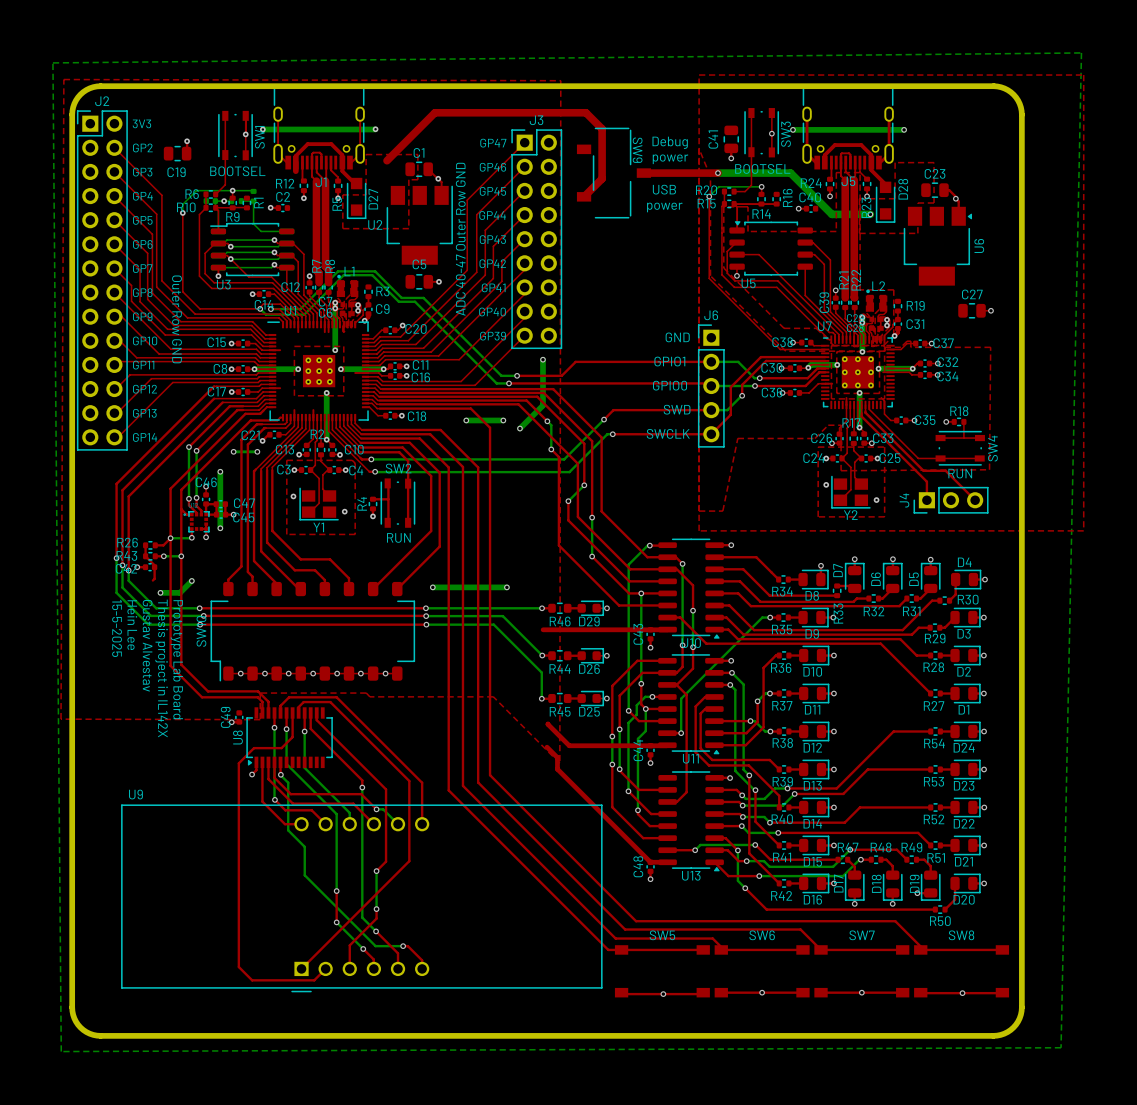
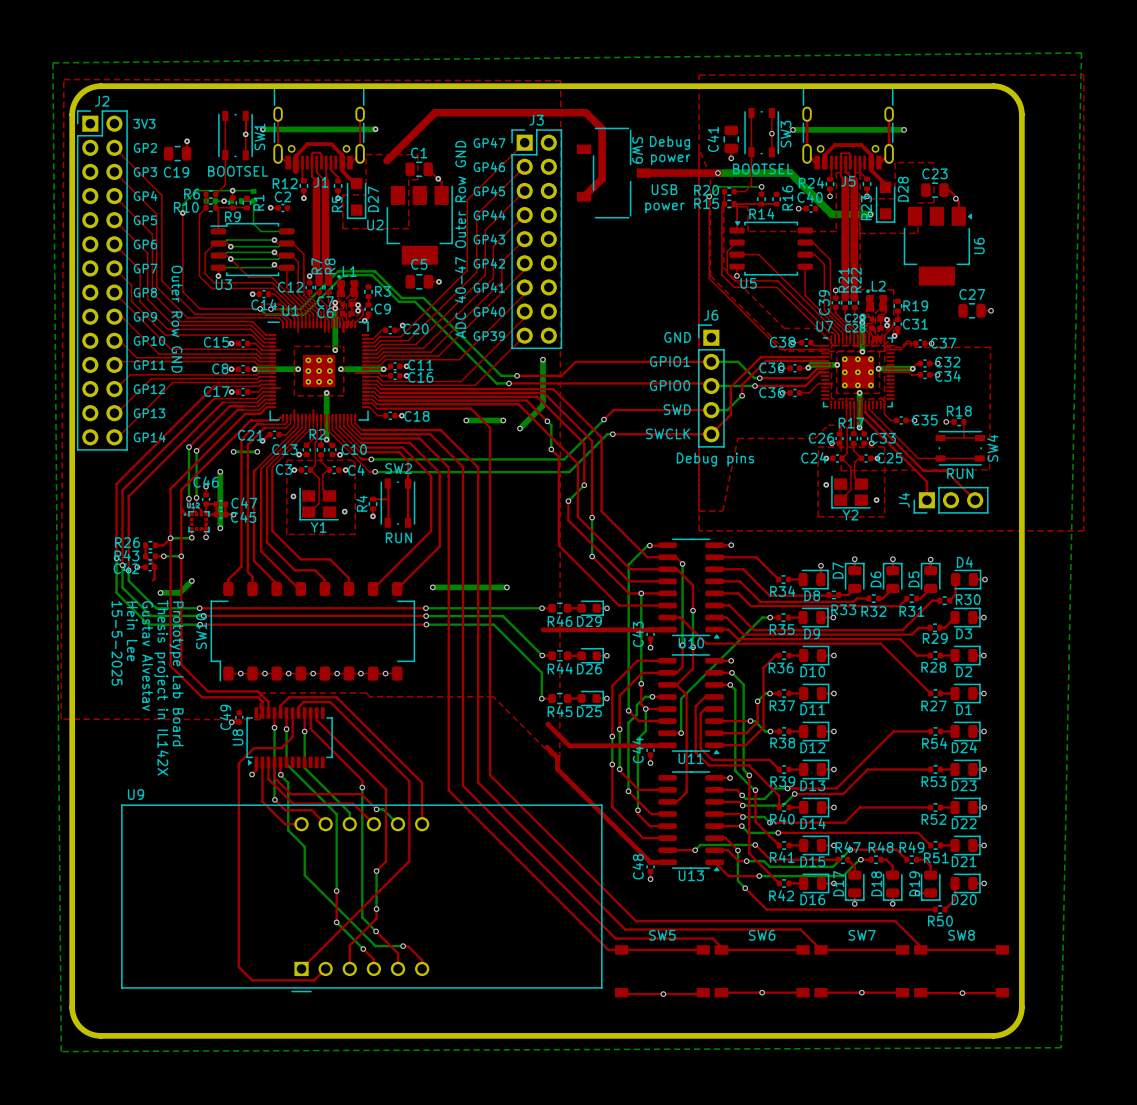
text: none -> Debug pins (715, 459)
top track: (837, 585) (852, 585) -> none
top track: none -> (854, 588) (848, 594) (838, 594)
R33 rotation: 0° (837, 590) -> 90° clockwise (833, 594)

